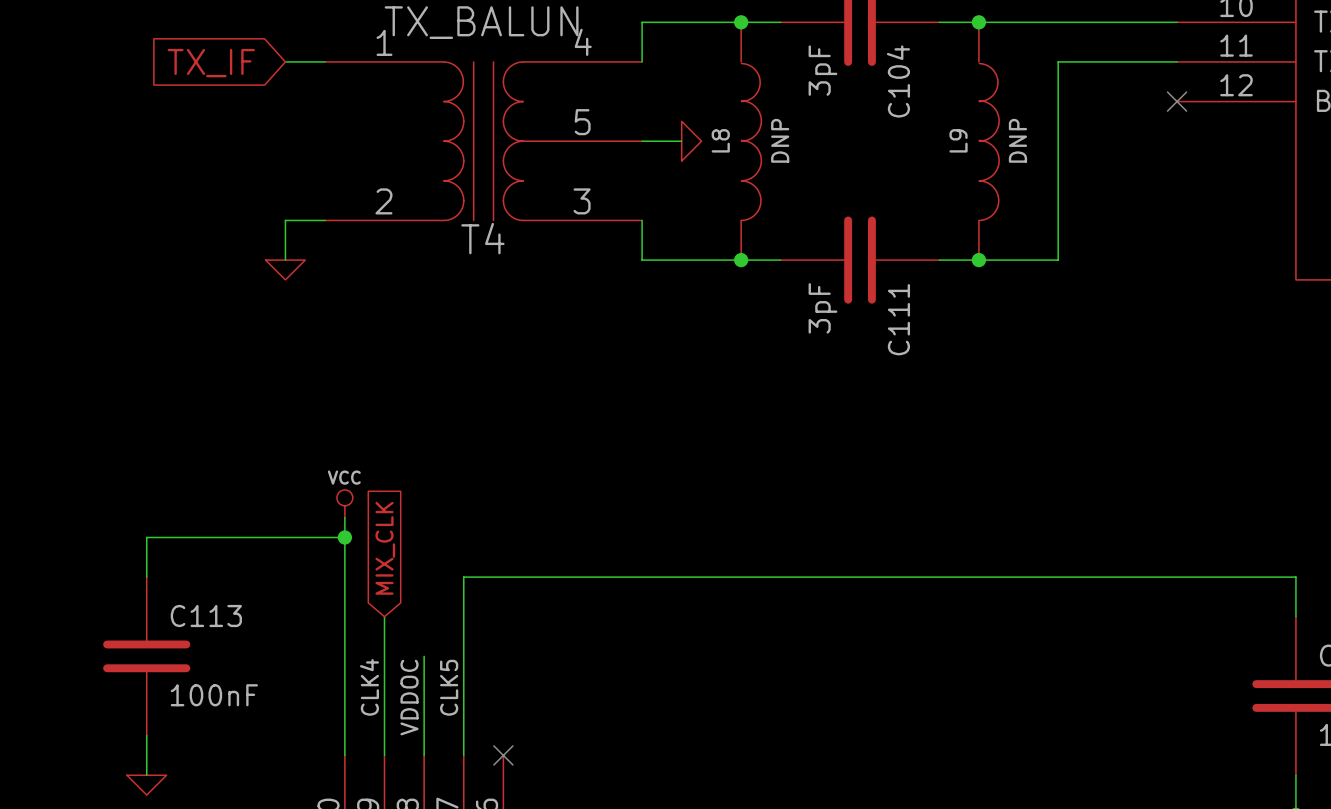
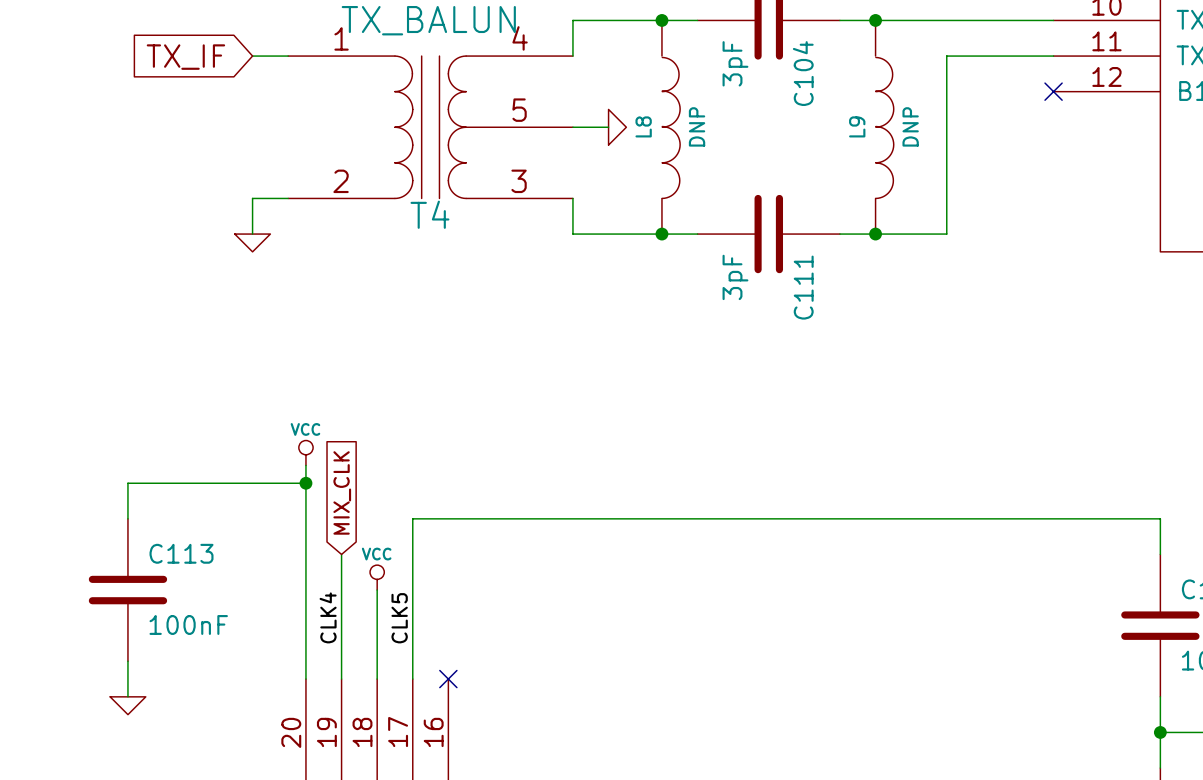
power symbol: none -> VCC (377, 577)
label: VDDOC (409, 697) -> none

